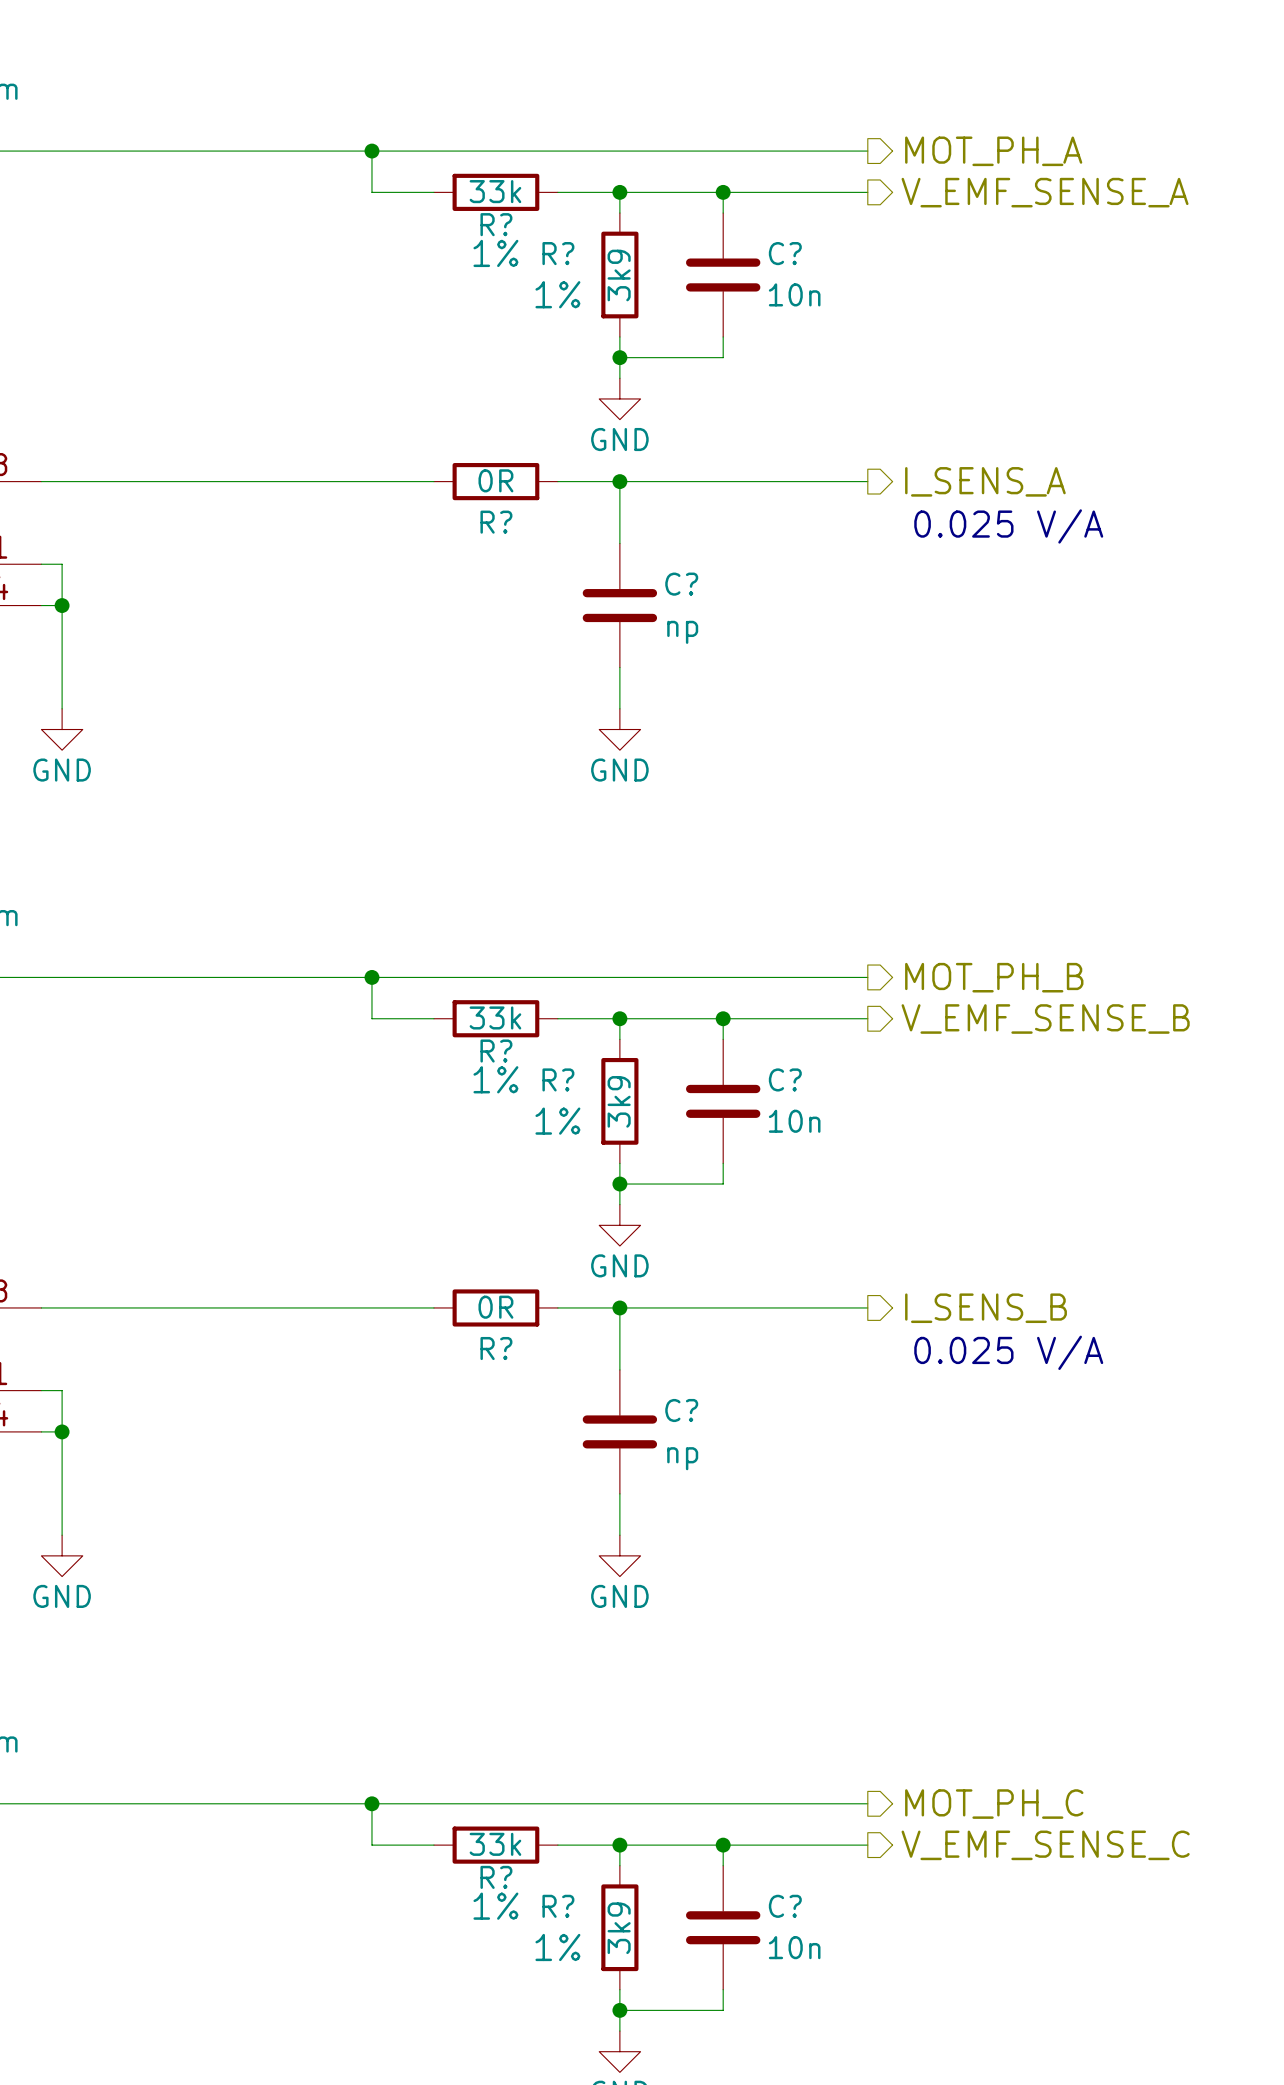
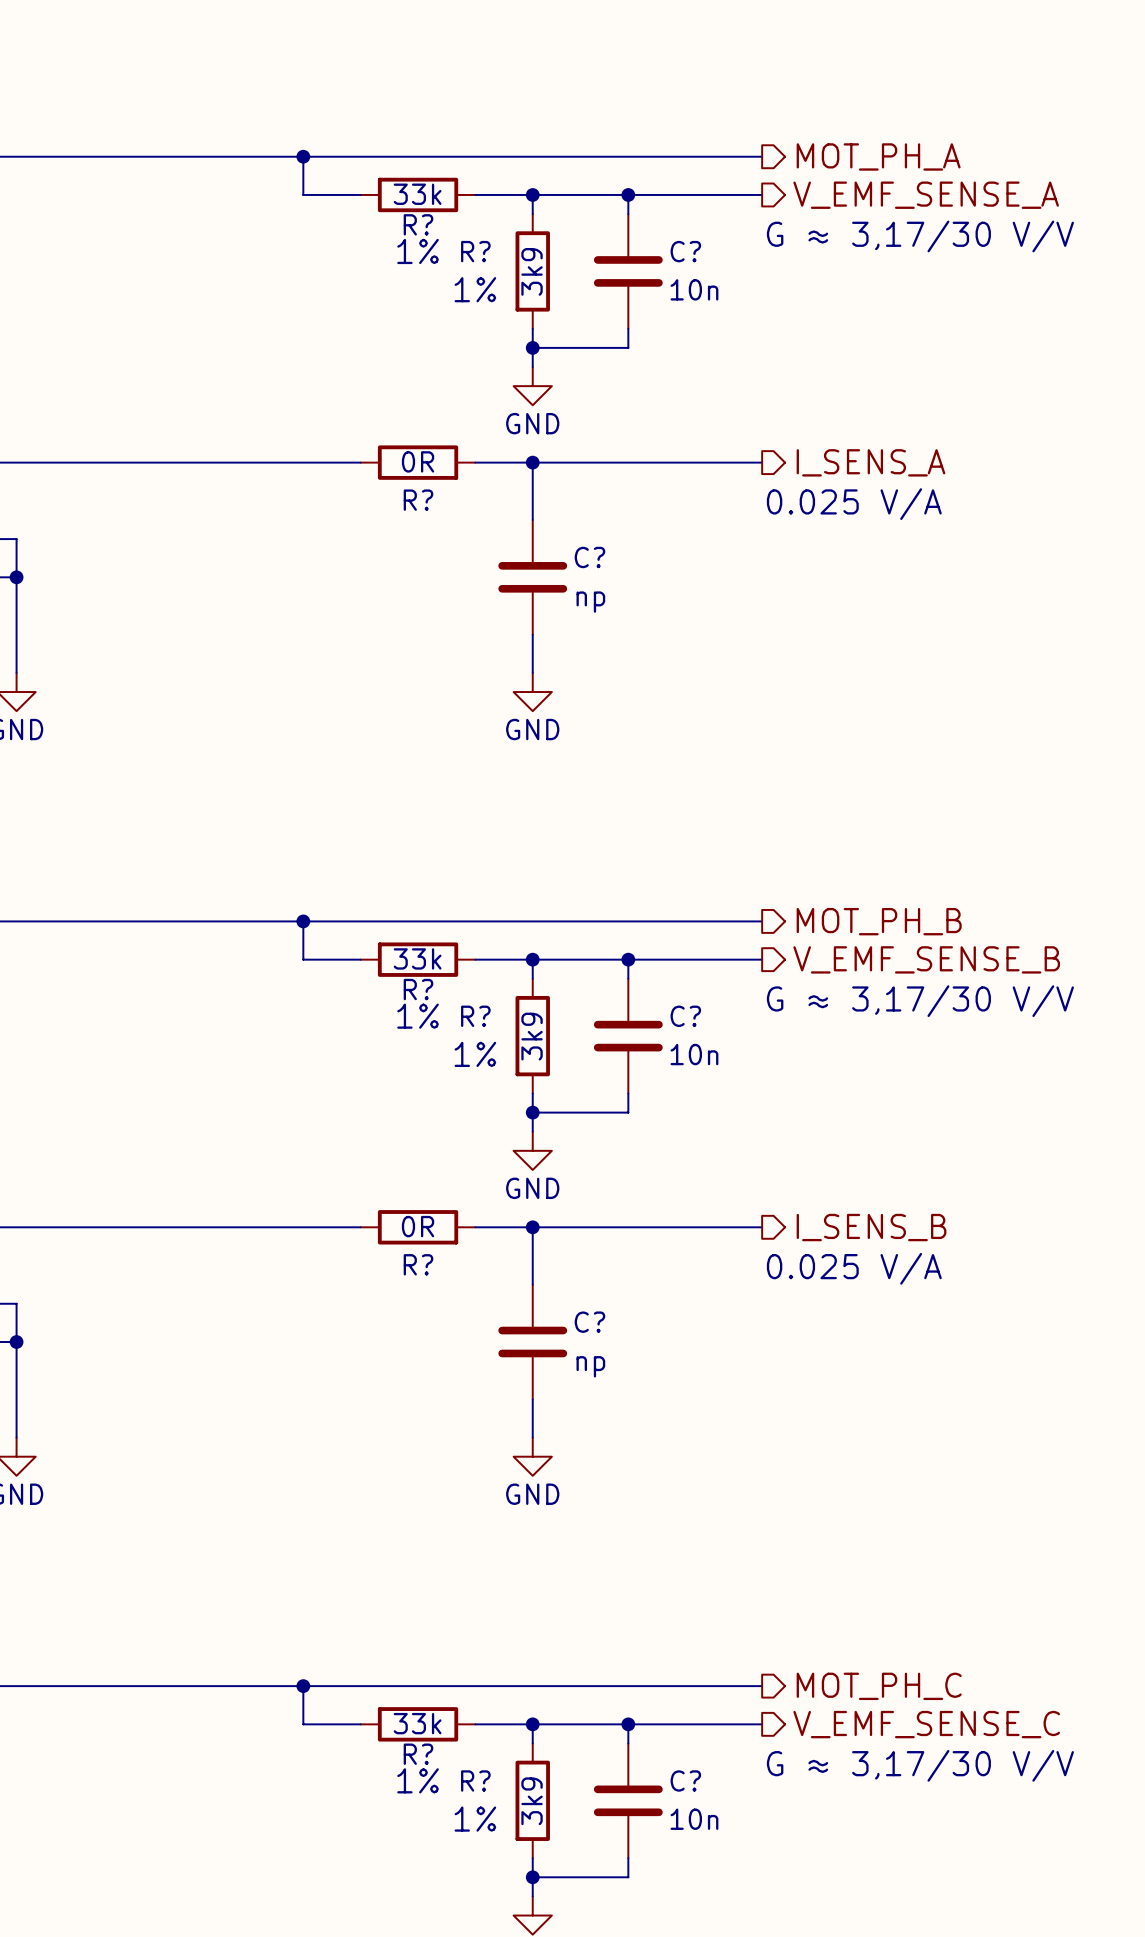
text: none -> G ≈ 3,17/30 V/V (920, 236)
text position: 0.025 V/A (1008, 526) -> 0.025 V/A (854, 504)
text: none -> G ≈ 3,17/30 V/V (920, 1001)
text position: 0.025 V/A (1008, 1352) -> 0.025 V/A (854, 1268)
text: none -> G ≈ 3,17/30 V/V (920, 1765)

